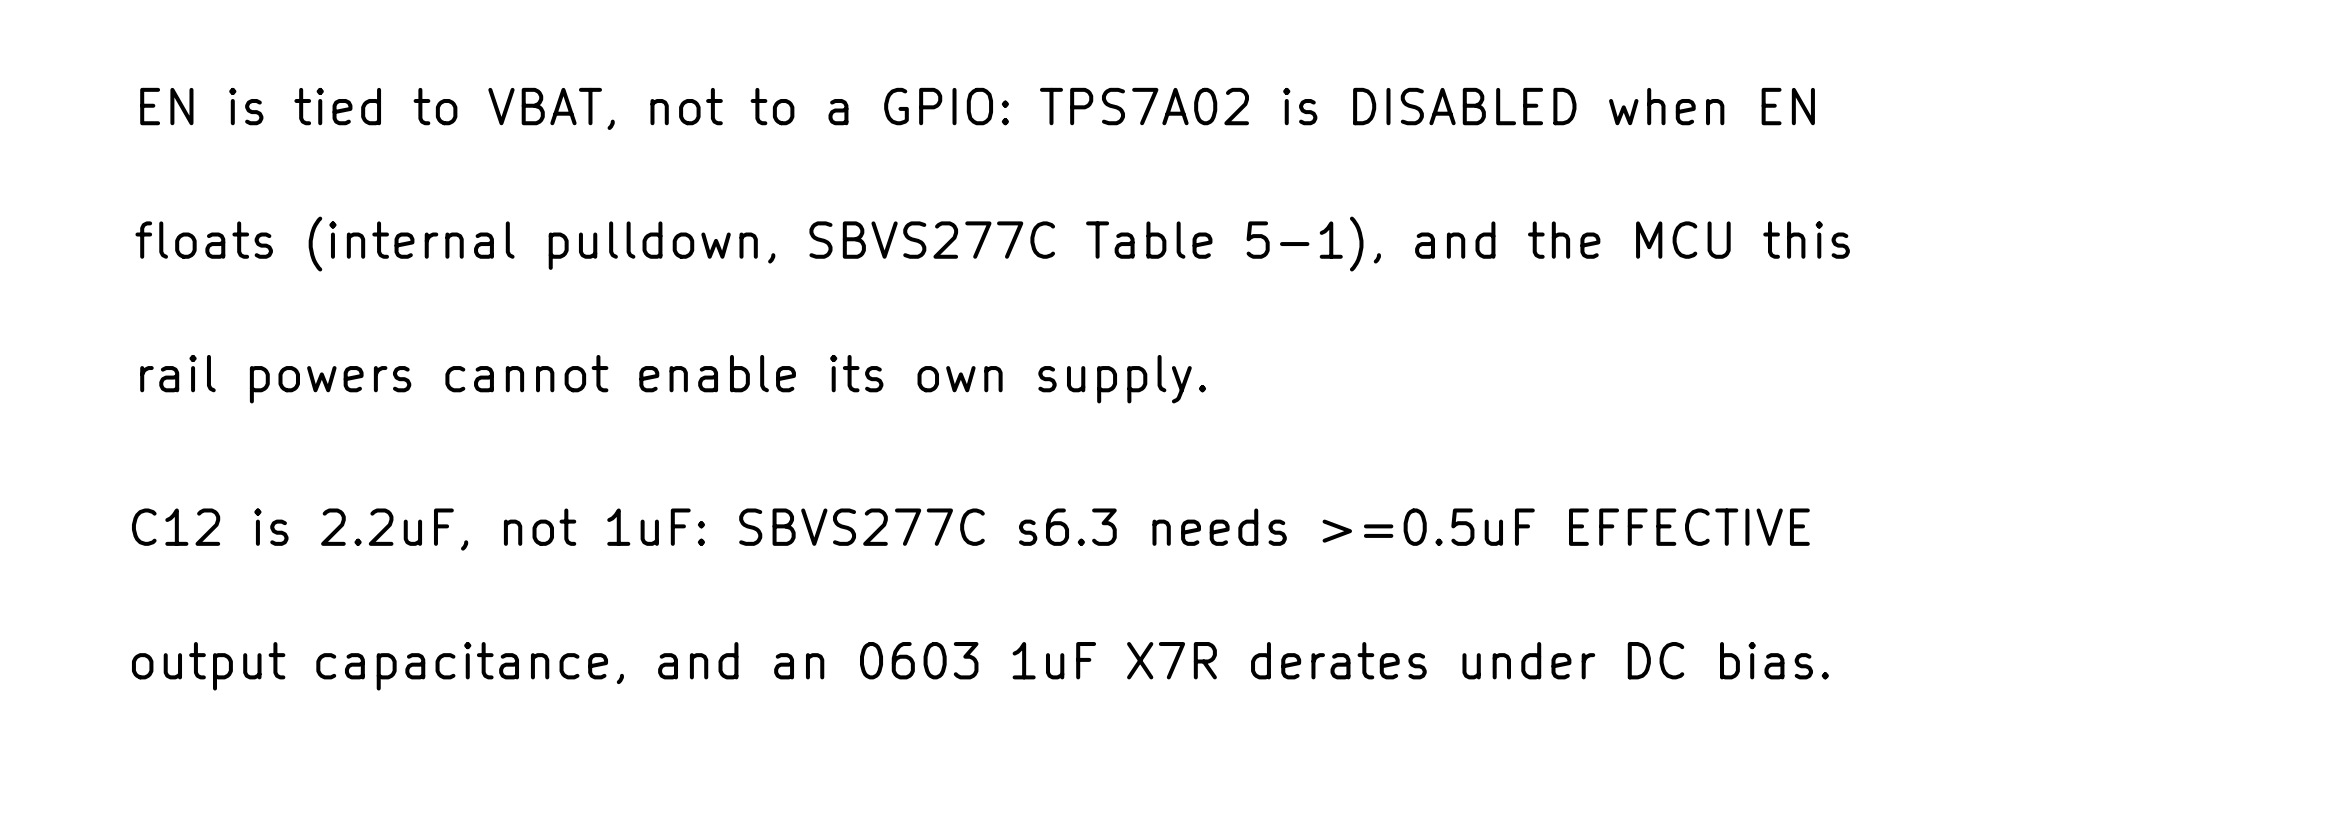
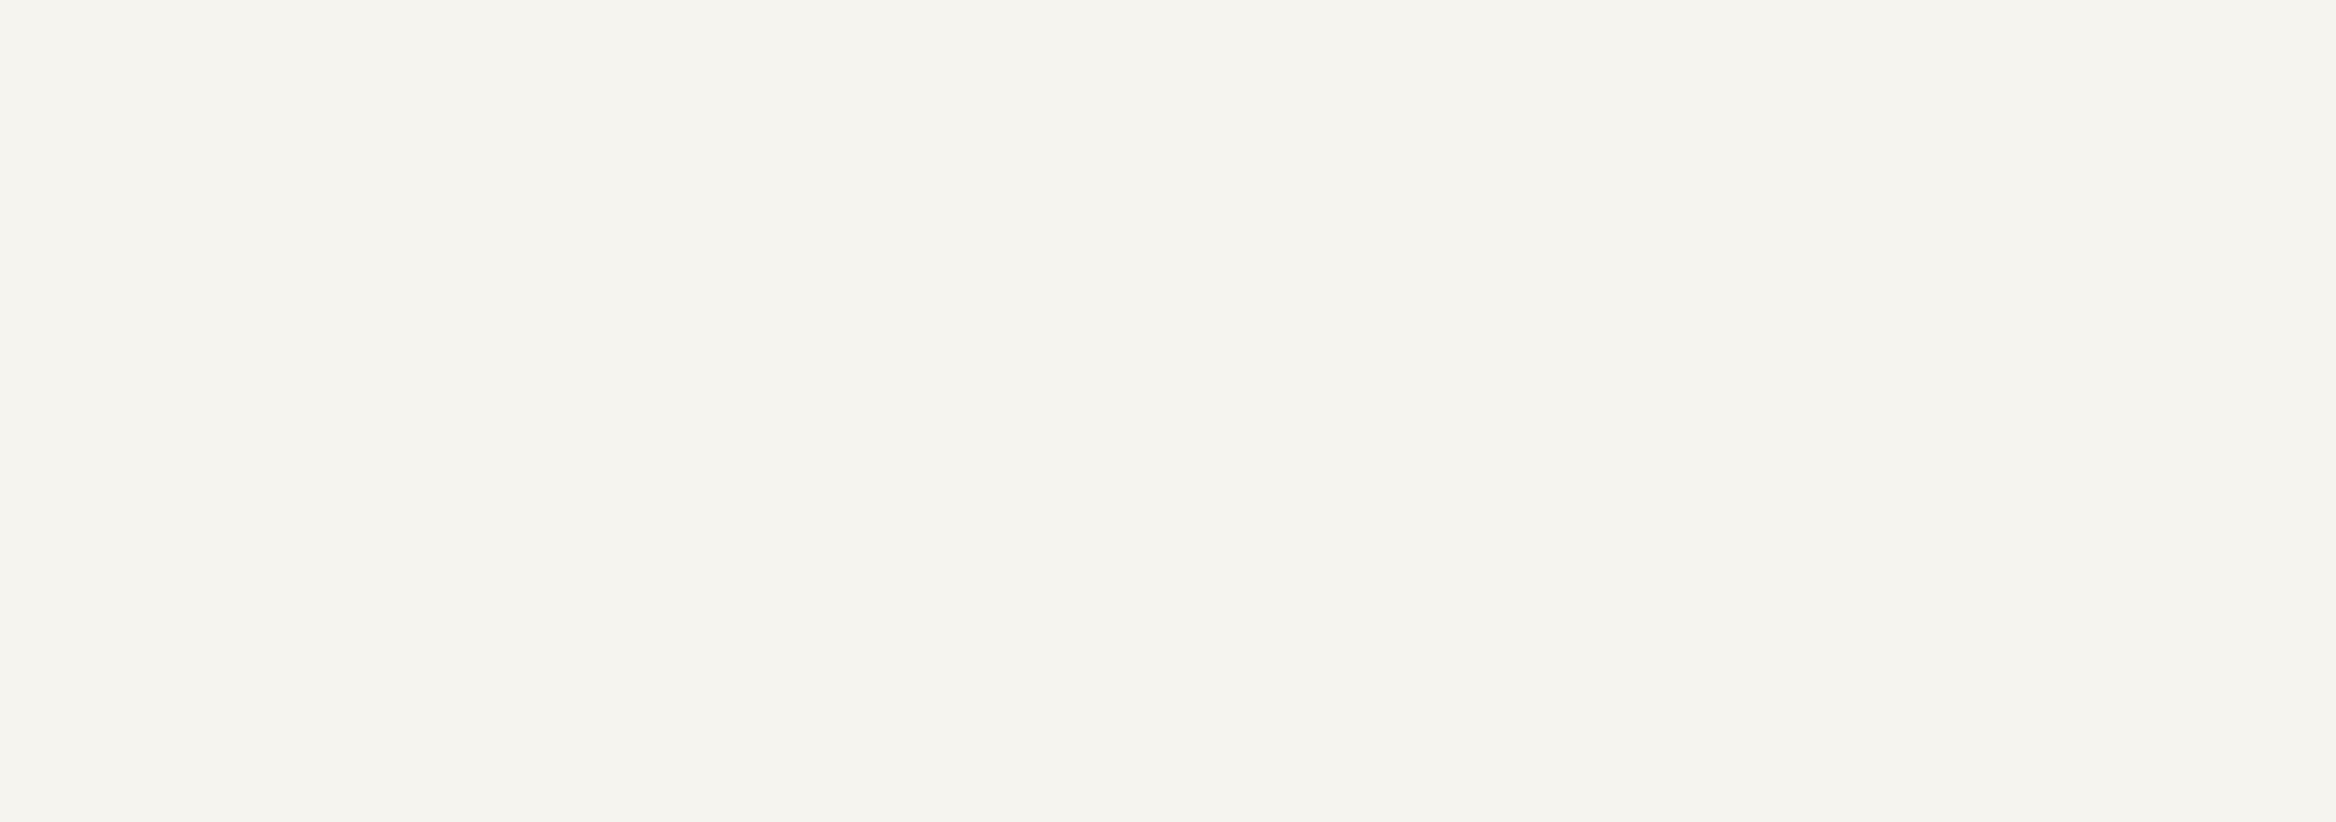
text: EN is tied to VBAT, not to a GPIO: TPS7A02 is DISABLED when EN (977, 108) -> none
text: floats (internal pulldown, SBVS277C Table 5-1), and the MCU this (992, 244) -> none
text: rail powers cannot enable its own supply. (673, 379) -> none
text: C12 is 2.2uF, not 1uF: SBVS277C s6.3 needs >=0.5uF EFFECTIVE (970, 529) -> none
text: output capacitance, and an 0603 1uF X7R derates under DC bias. (980, 666) -> none

